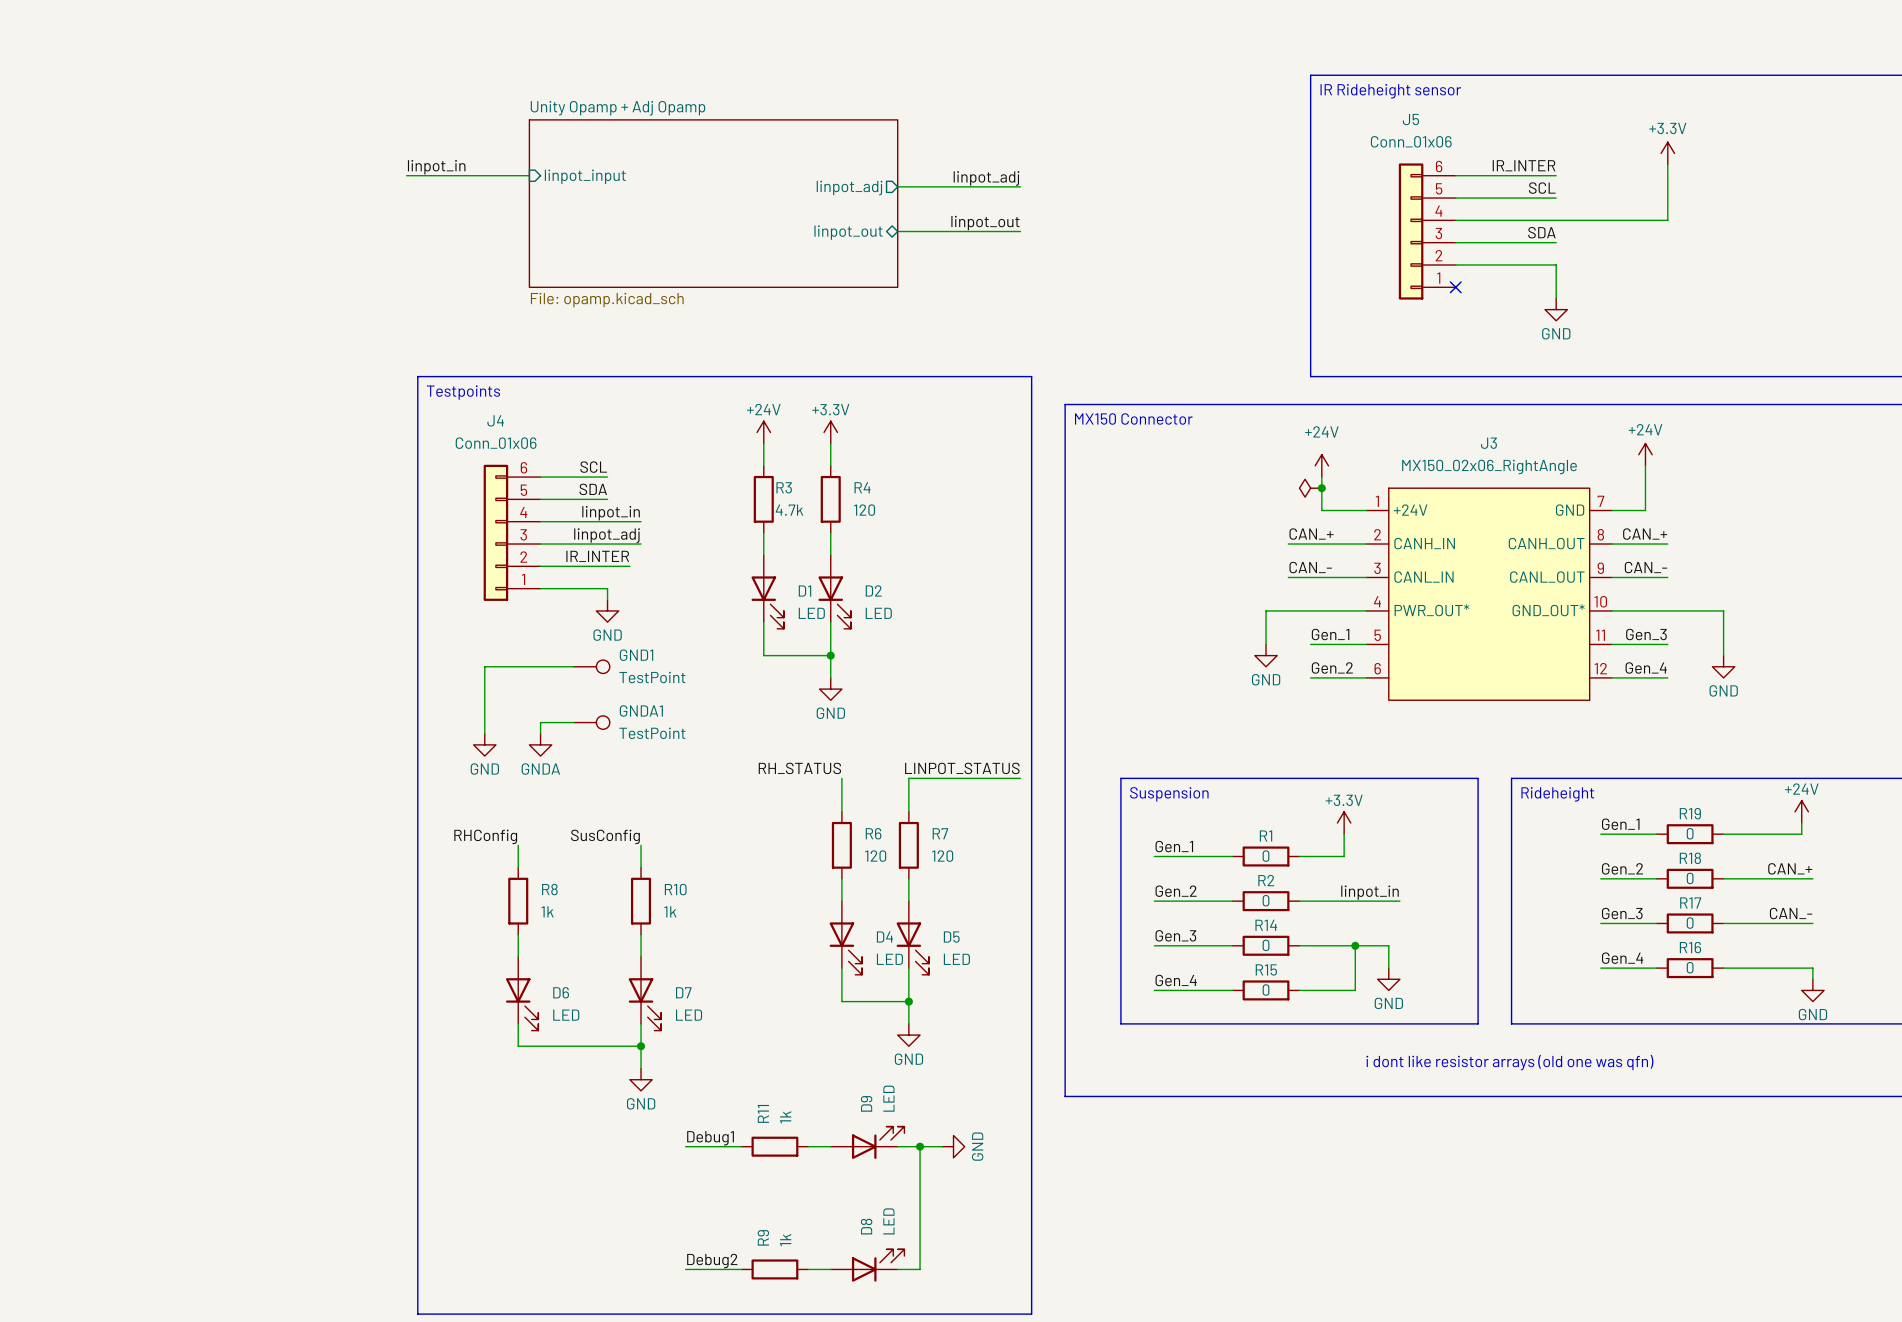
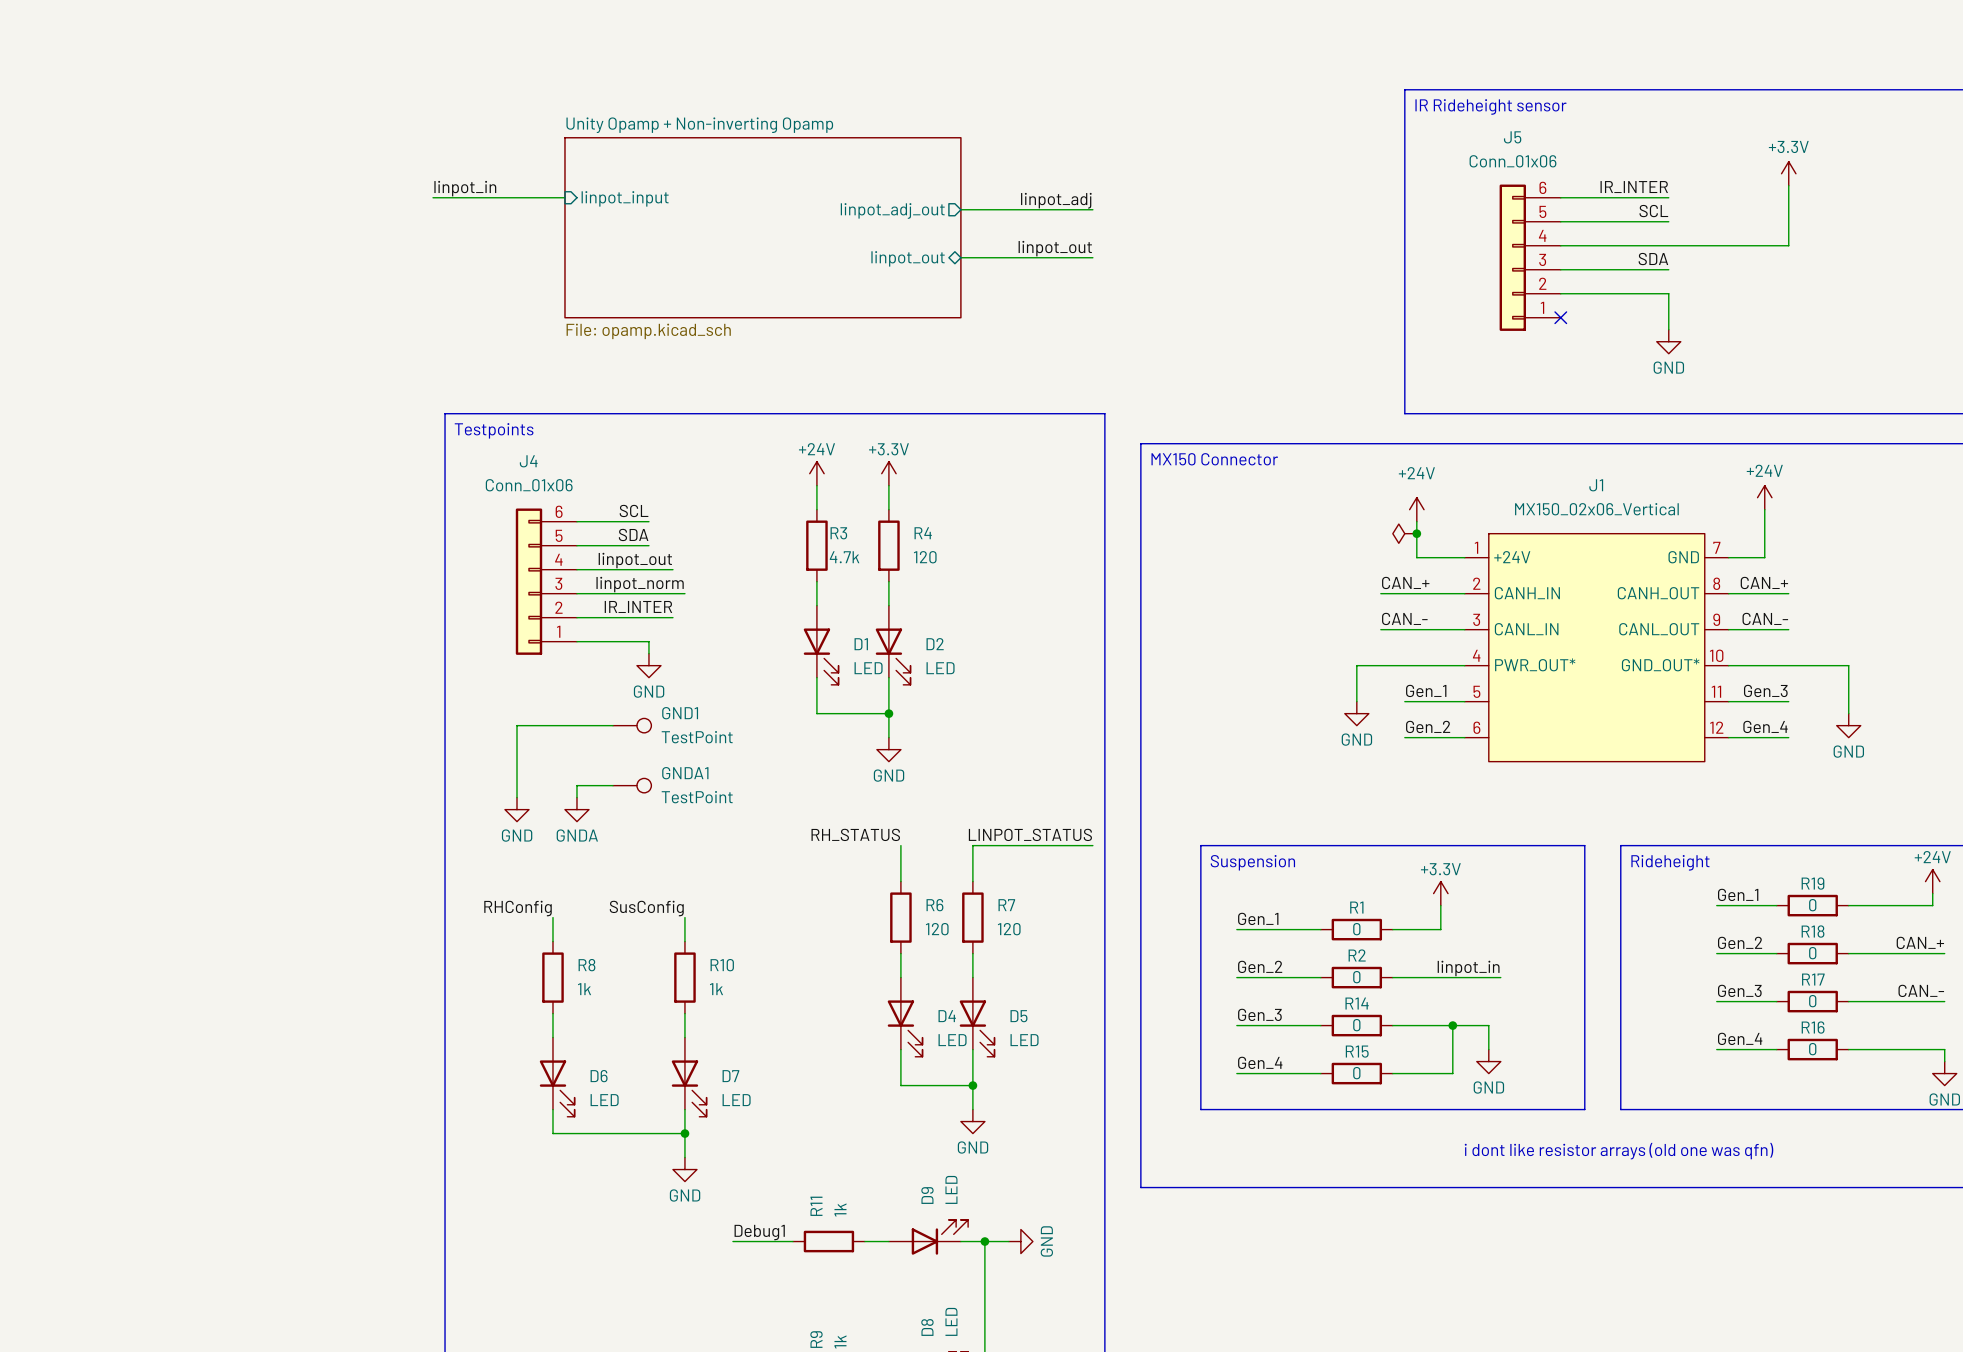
sheet Unity Opamp + Adj Opamp name: Unity Opamp + Adj Opamp (618, 108) -> Unity Opamp + Non-inverting Opamp (699, 125)
sheet pin: linpot_adj (849, 188) -> linpot_adj_out (892, 210)
J3 name: J3 (1488, 443) -> J1 (1596, 485)
J3 value: MX150_02x06_RightAngle (1489, 466) -> MX150_02x06_Vertical (1596, 509)
label: linpot_in (611, 513) -> linpot_out (635, 560)
wire: (629, 521) (641, 521) -> none
label: linpot_adj (607, 535) -> linpot_norm (640, 584)

